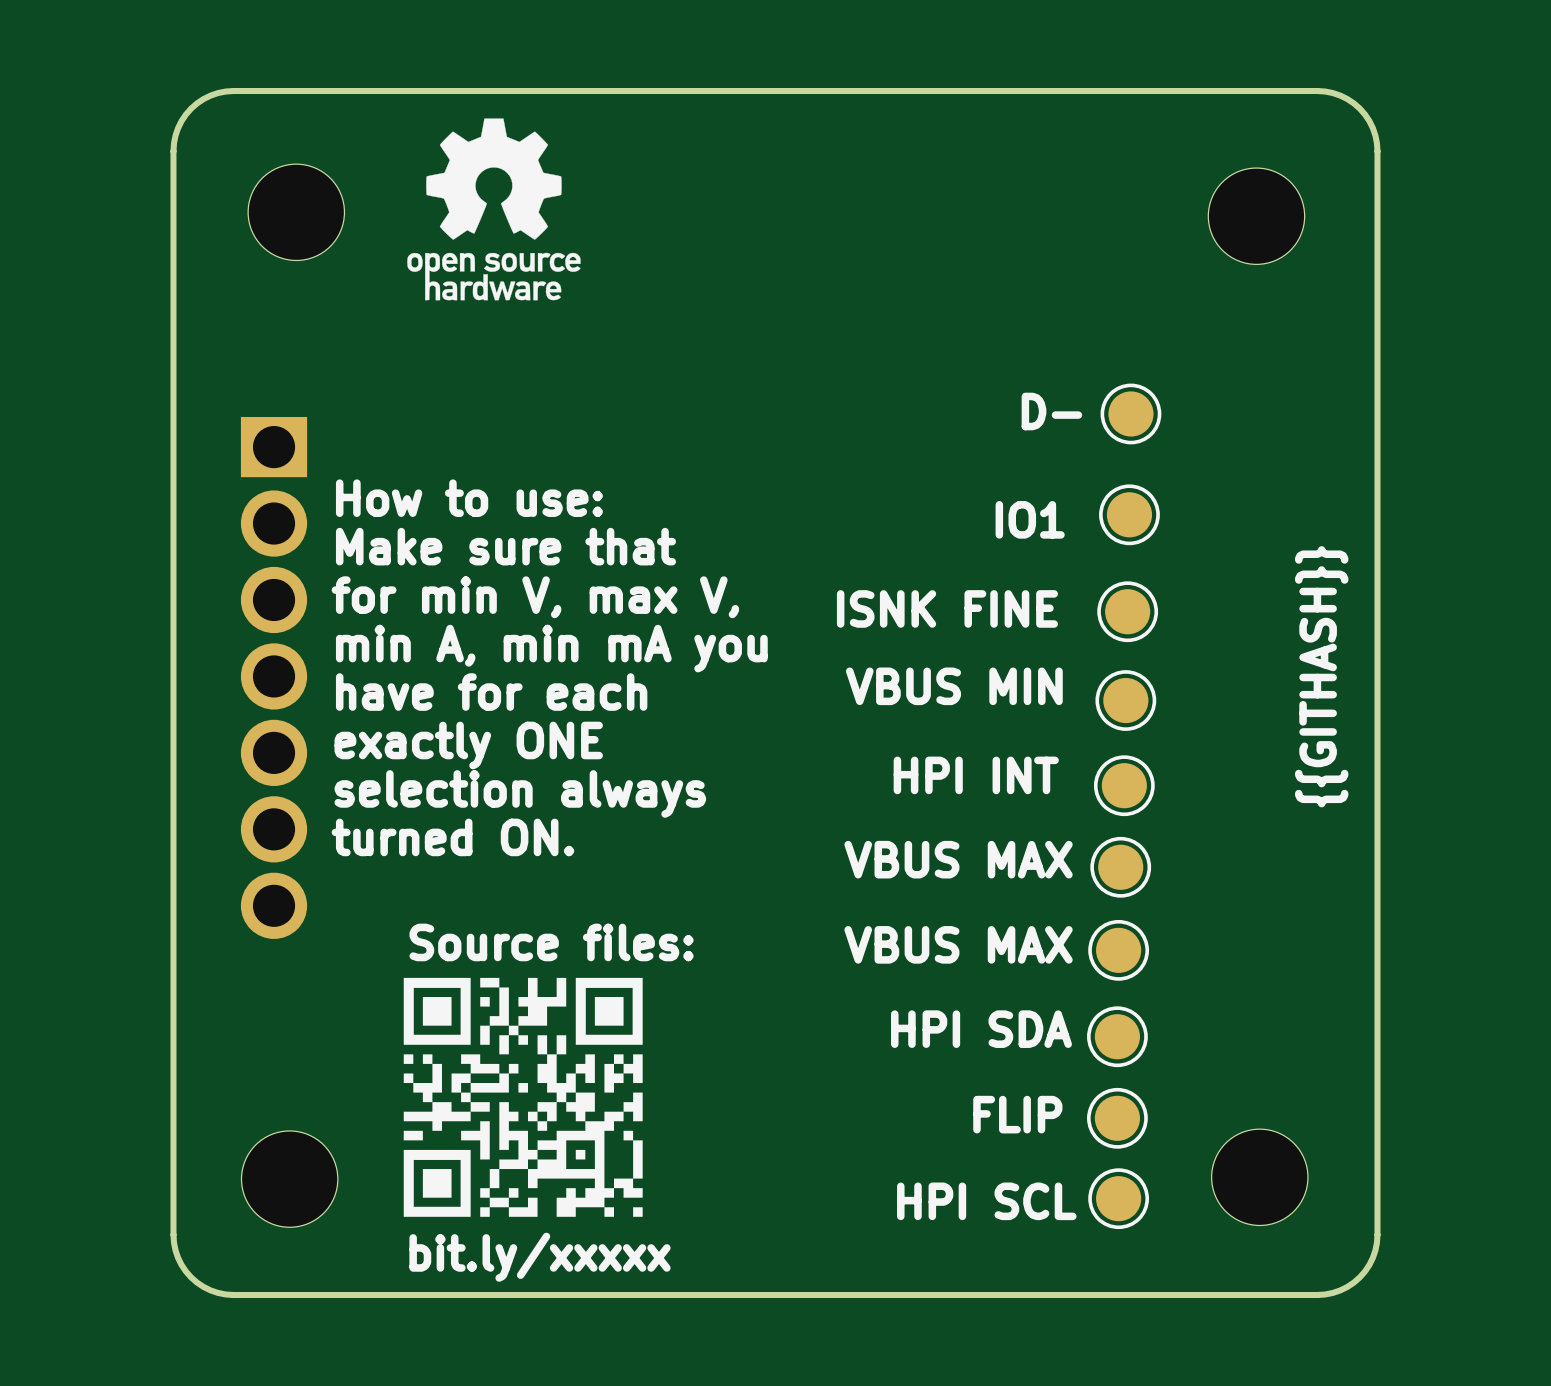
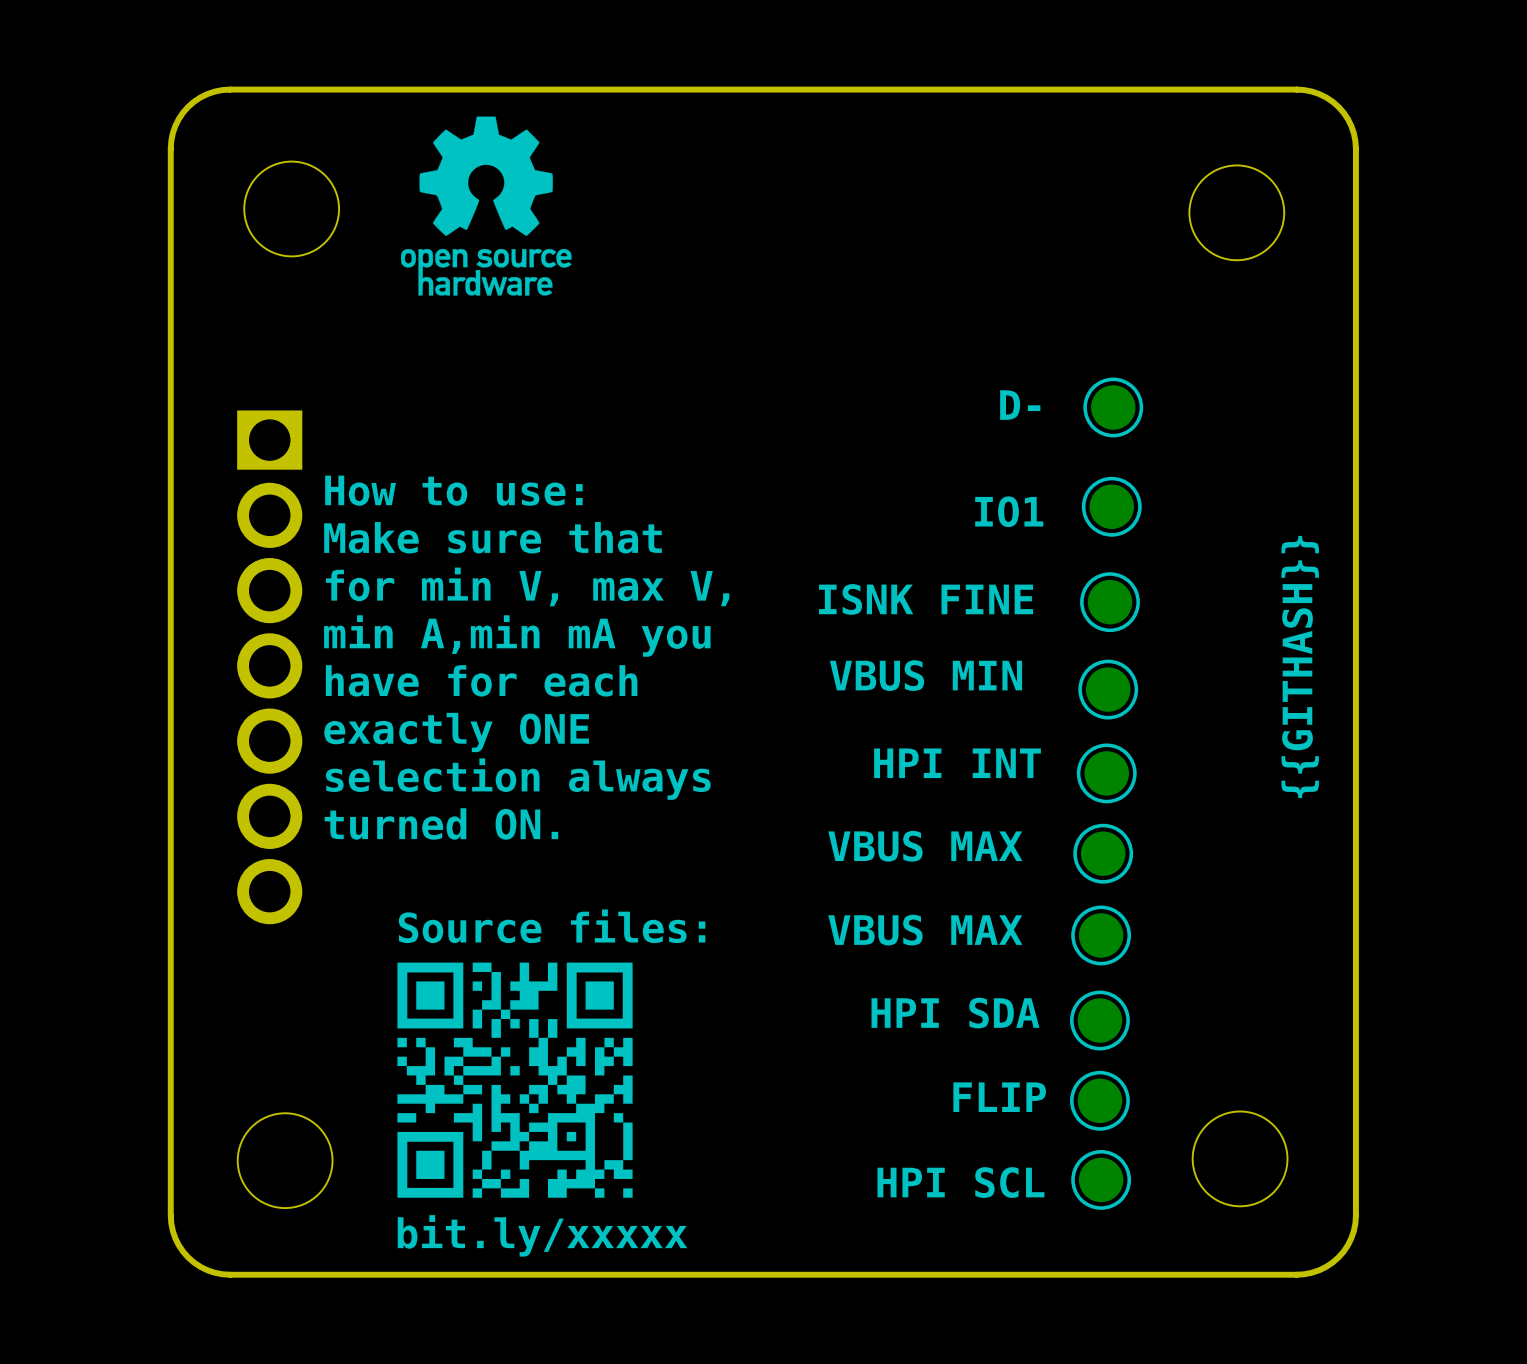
text: min A, min mA you (551, 648) -> min A,min mA you (517, 636)

